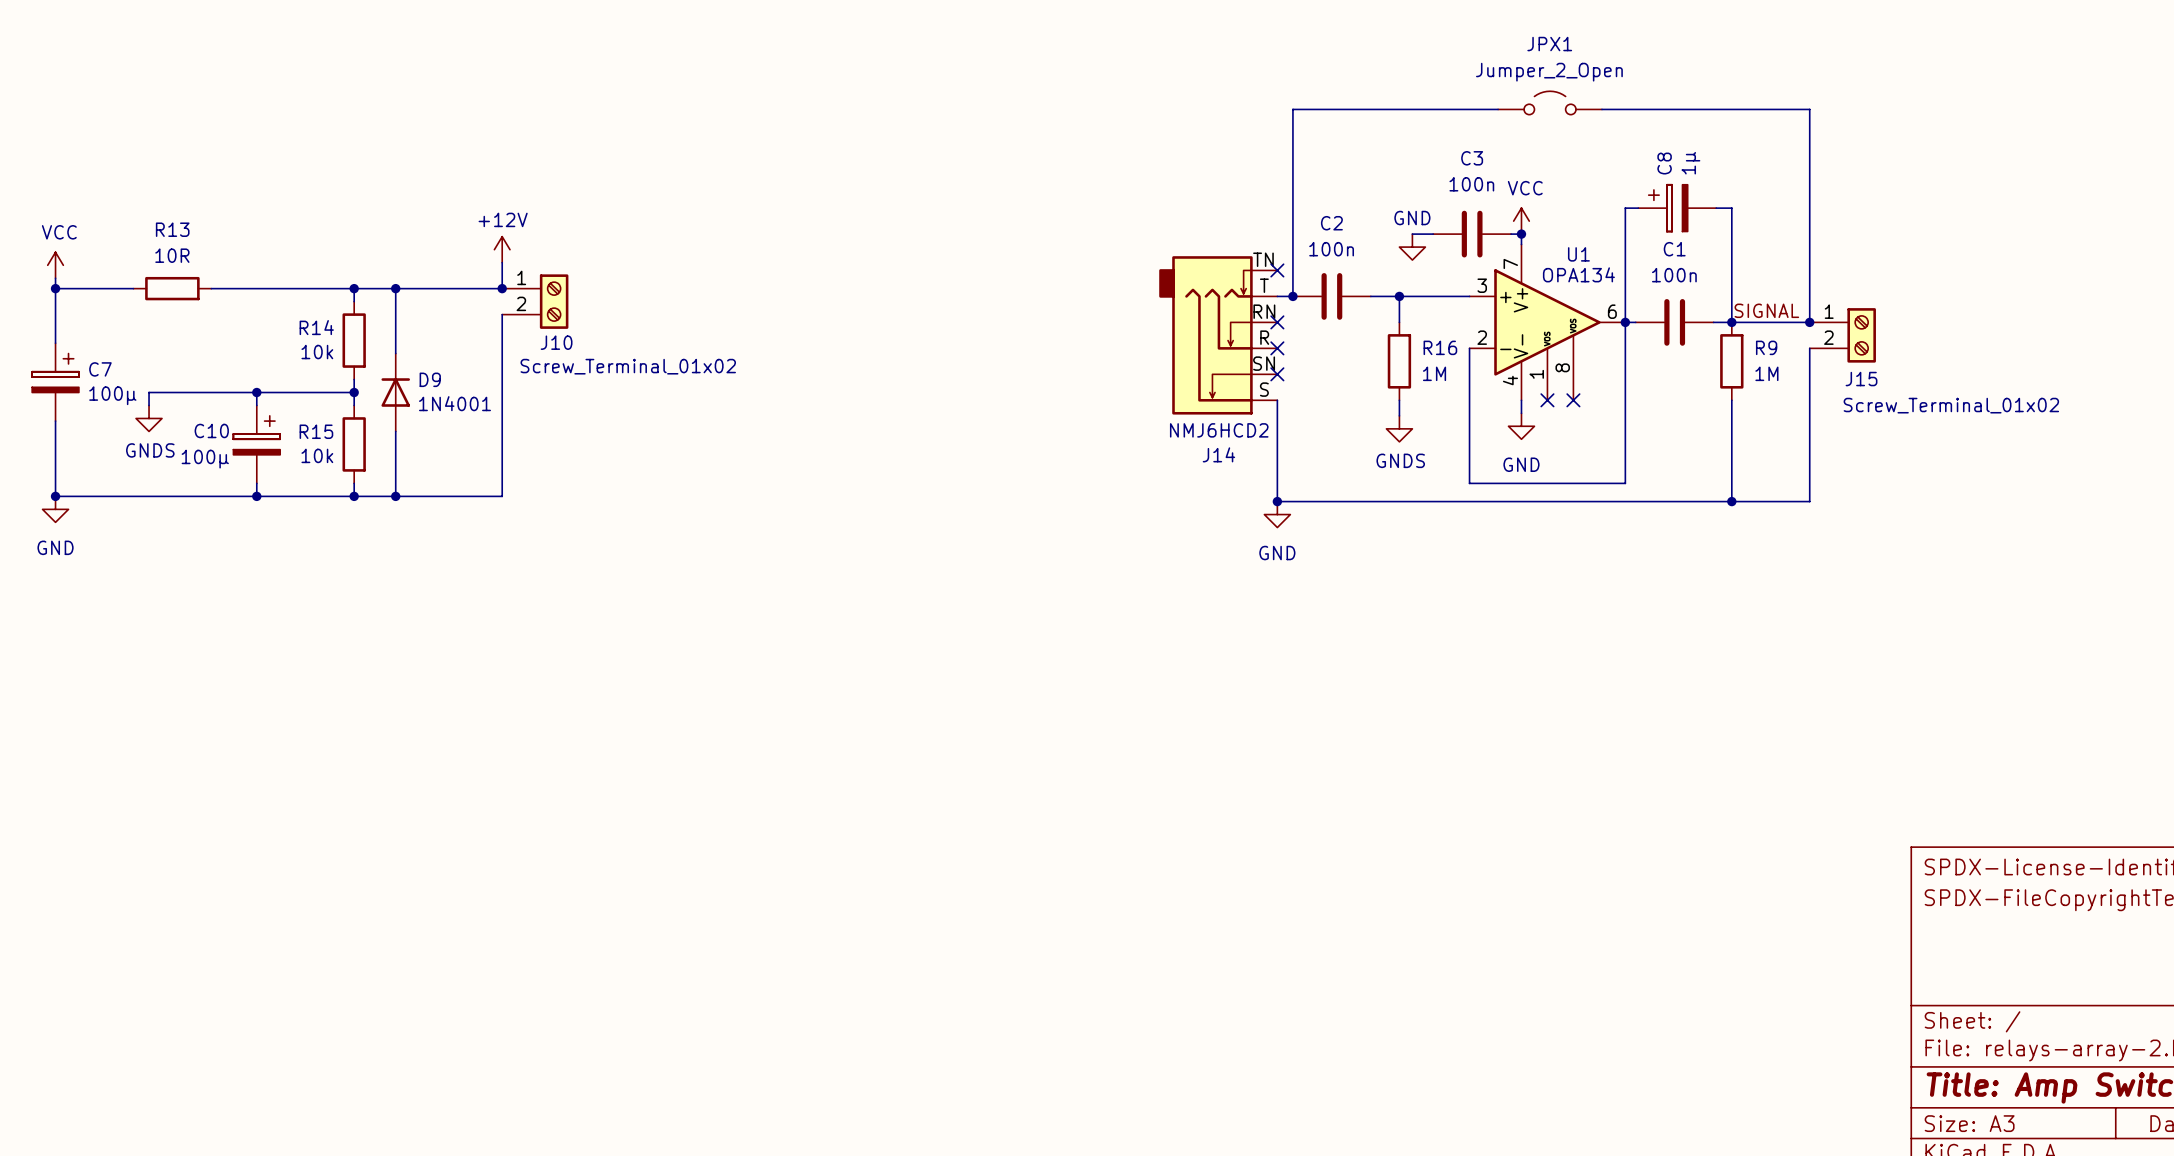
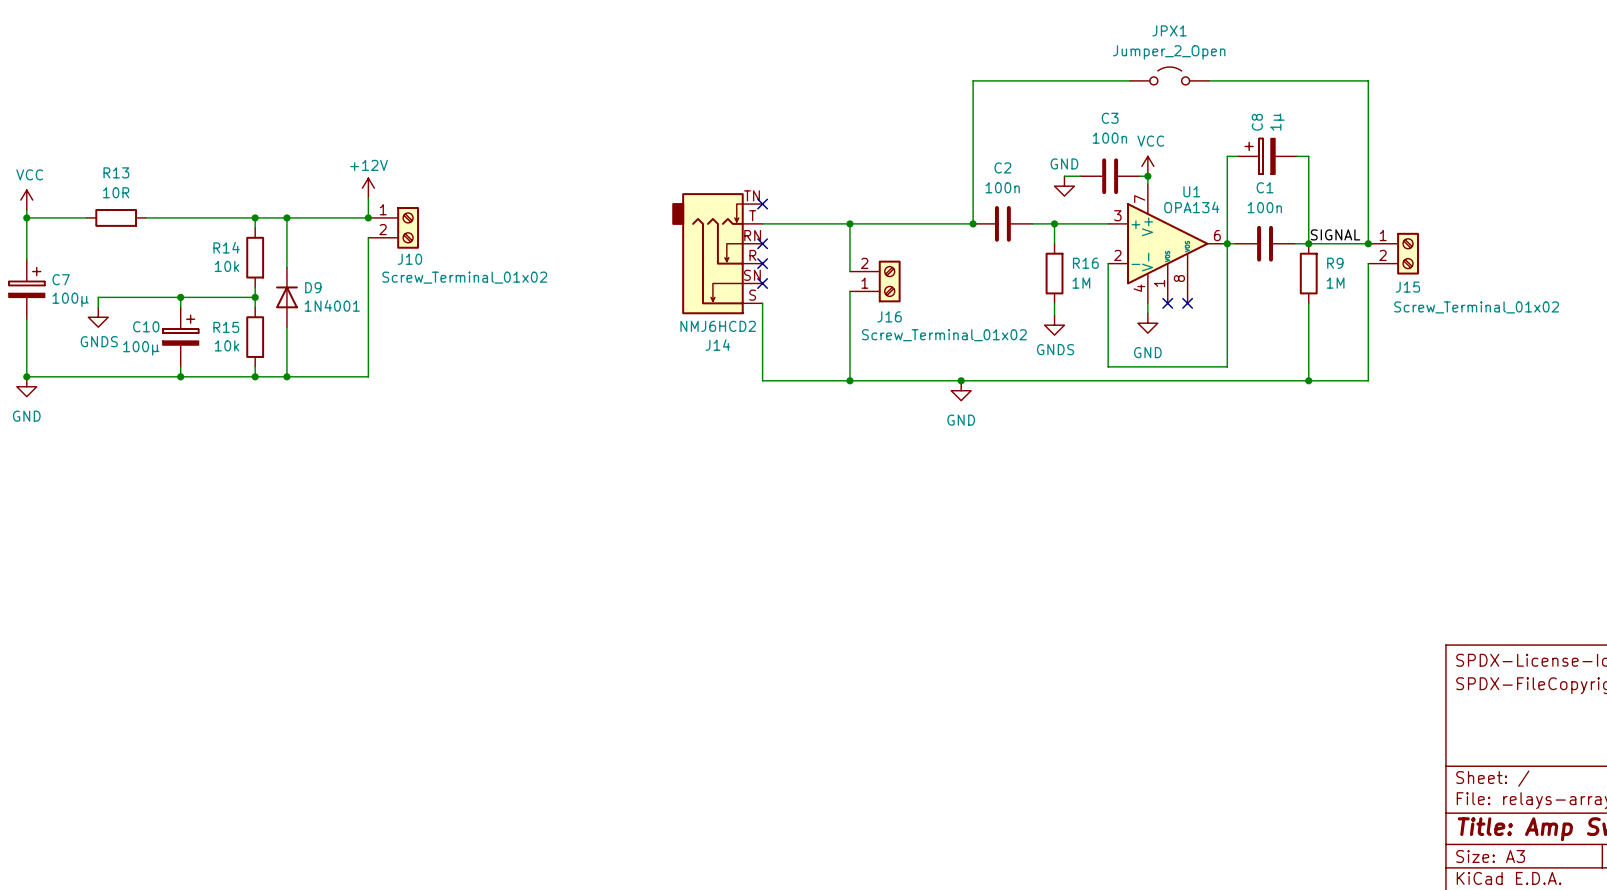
no-connect mark: none -> (762, 204)
no-connect mark: (1277, 270) -> none
wire: none -> (762, 223) (961, 223)
wire: none -> (849, 223) (849, 271)
junction: none -> (849, 223)
no-connect mark: none -> (762, 243)
no-connect mark: (1277, 322) -> none
J14 position: (1218, 335) -> (717, 253)
no-connect mark: none -> (762, 263)
no-connect mark: (1277, 348) -> none
J16: none -> Screw_Terminal_01x02 (875, 281)
no-connect mark: none -> (762, 283)
no-connect mark: (1277, 374) -> none
wire: none -> (849, 291) (849, 380)
wire: (1277, 400) (1277, 501) -> (762, 303) (762, 380) (961, 380)
junction: none -> (849, 380)

